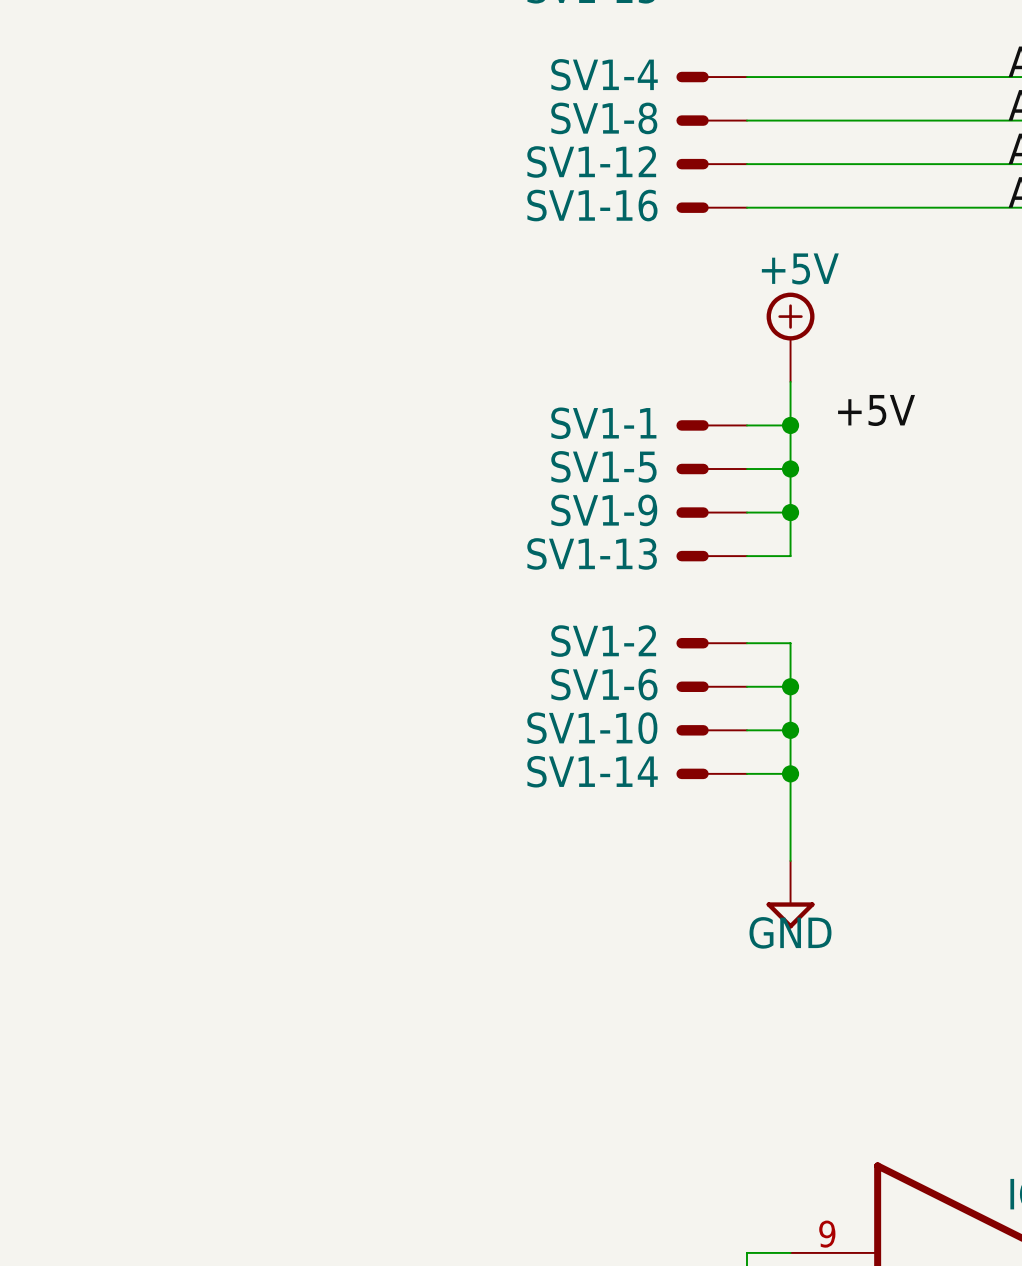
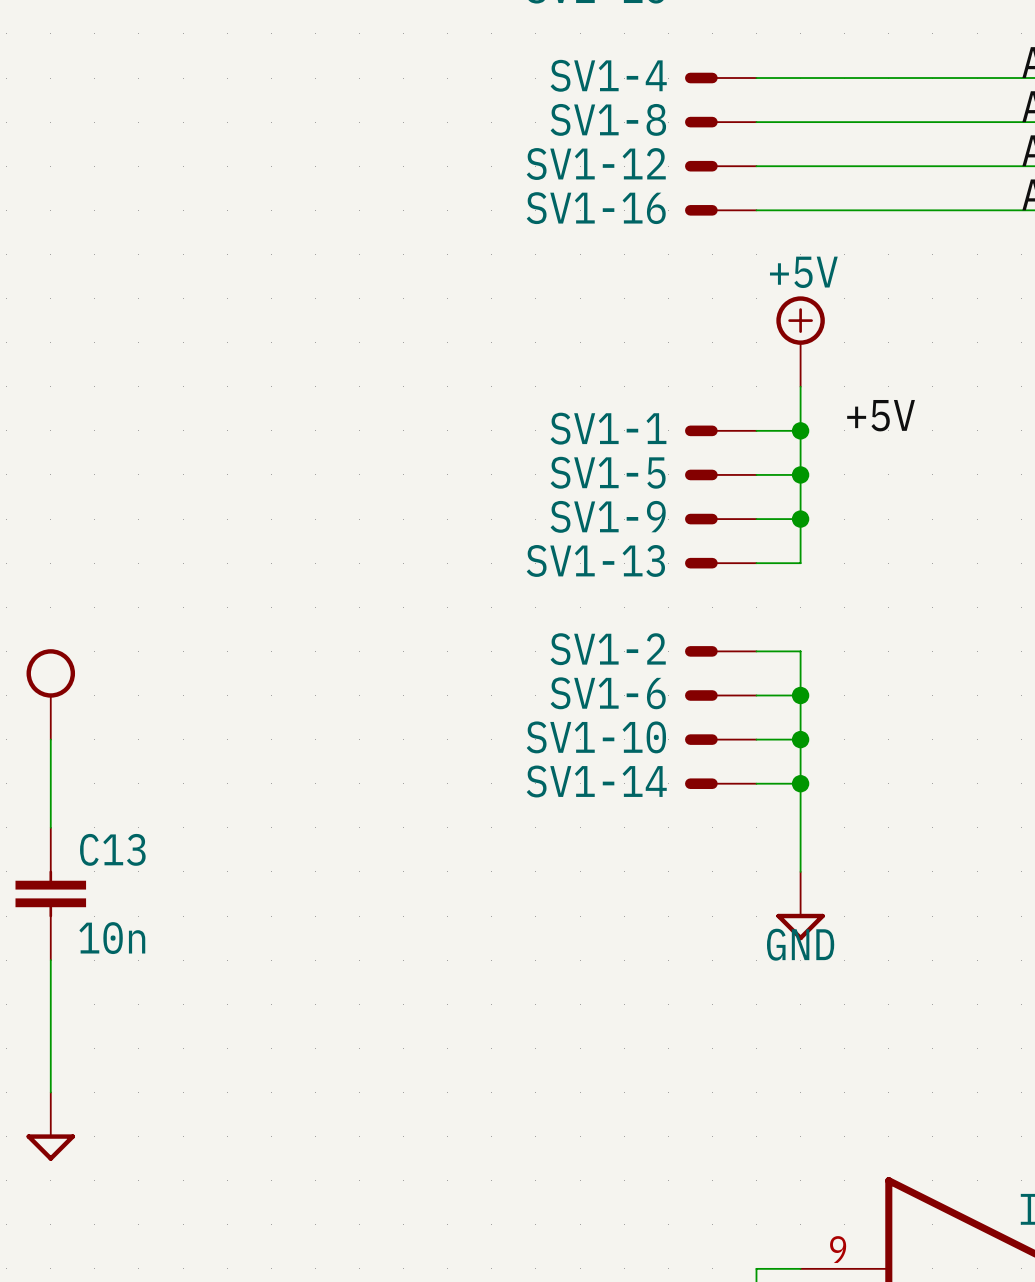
power symbol: none -> (50, 694)
wire: none -> (50, 739) (50, 827)
C13: none -> 10n (50, 893)
wire: none -> (50, 960) (50, 1092)
power symbol: none -> (50, 1126)

